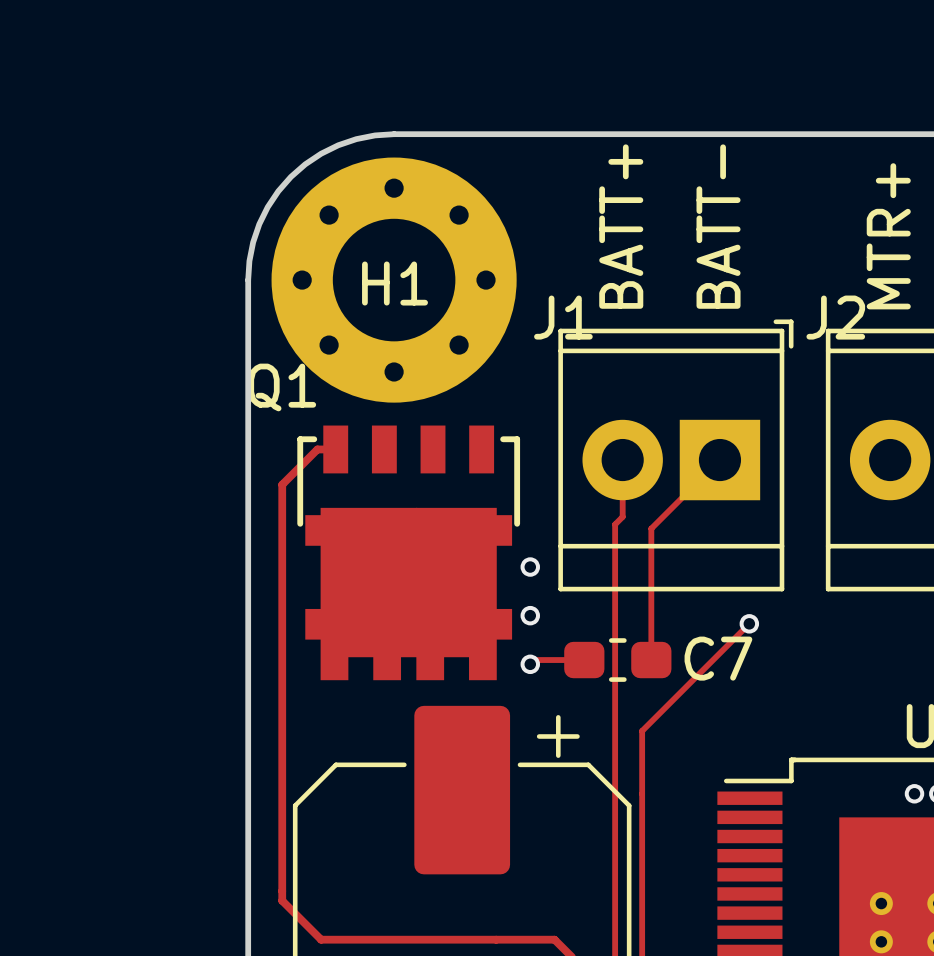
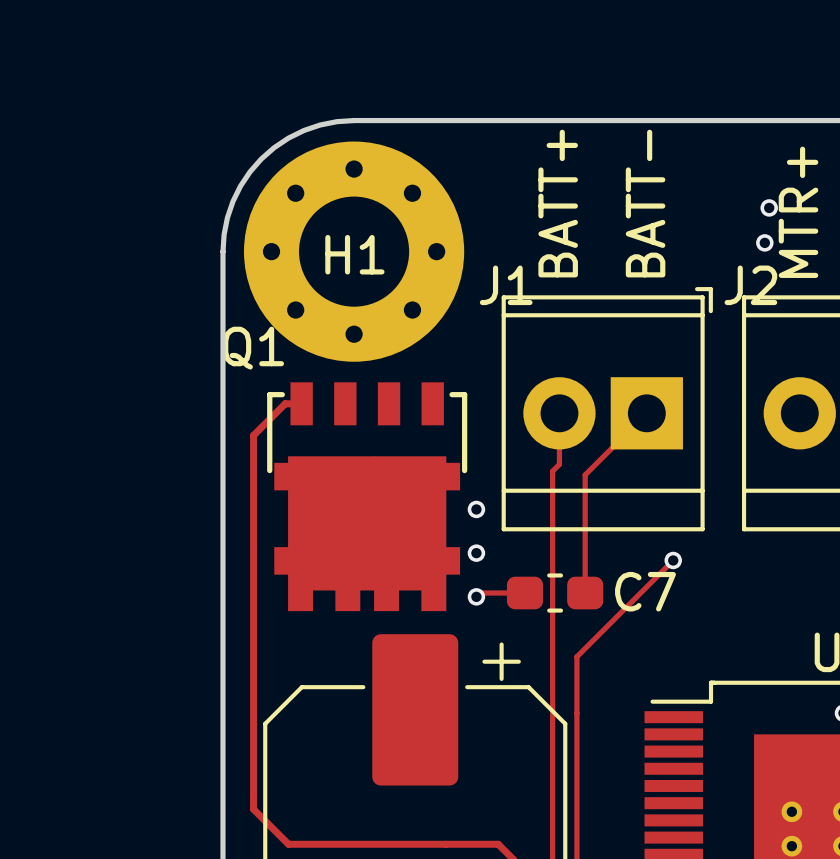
via: none -> (769, 207)
via: none -> (764, 242)
via: (914, 793) -> none

